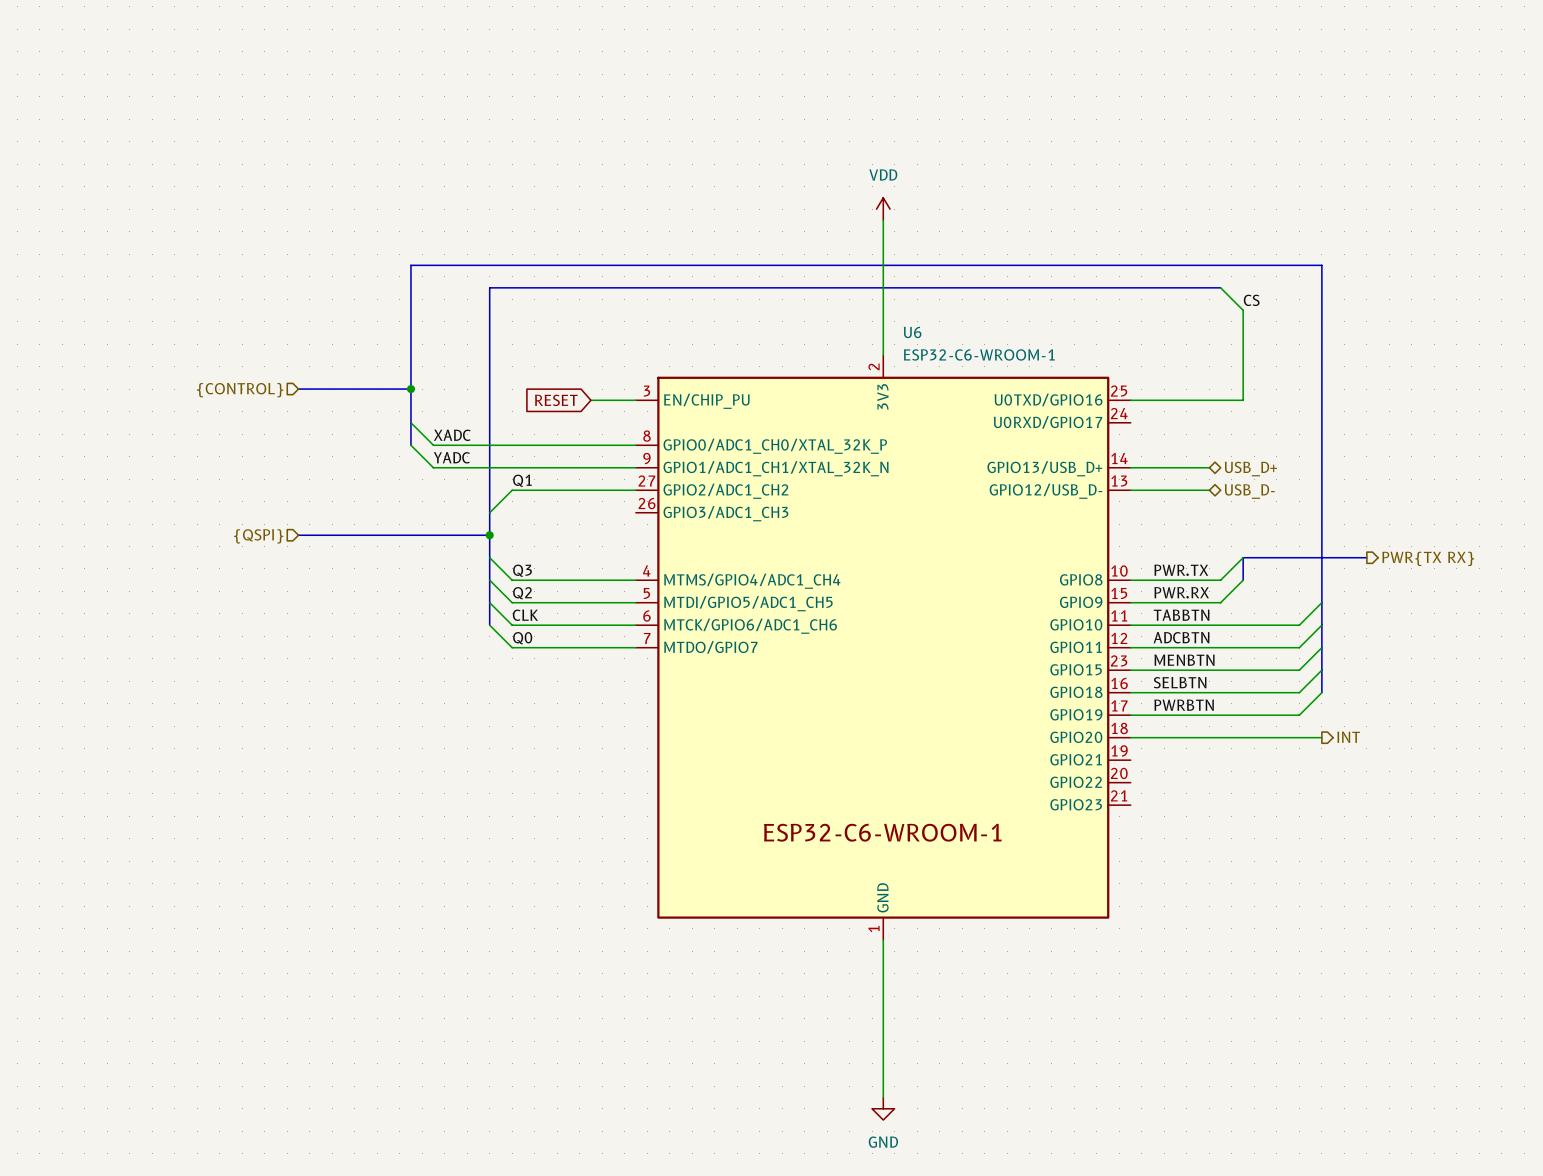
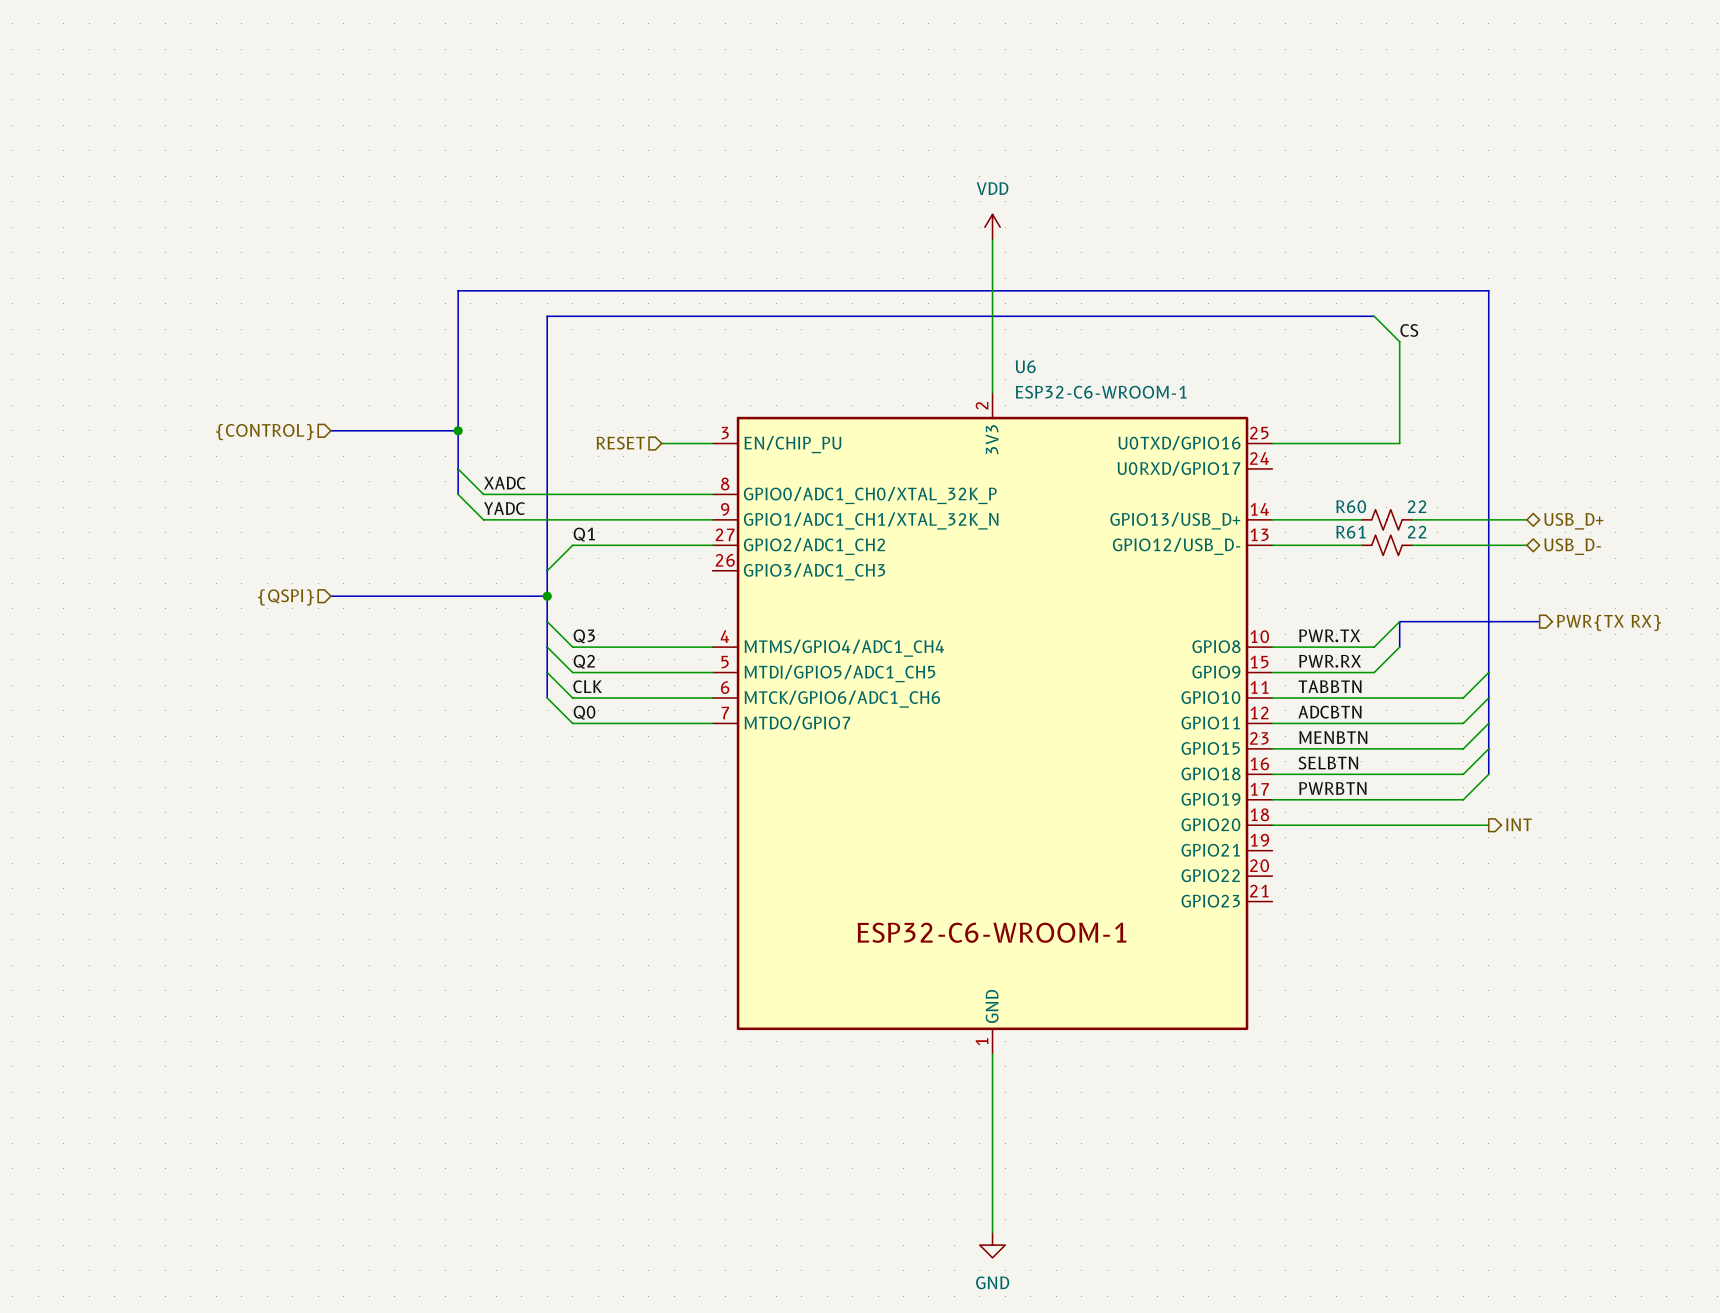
hierarchical label: none -> RESET (620, 443)
global label: RESET (556, 400) -> none
R60: none -> 22 (1386, 519)
wire: none -> (1412, 519) (1526, 519)
hierarchical label position: USB_D+ (1250, 469) -> USB_D+ (1573, 521)
R61: none -> 22 (1386, 545)
wire: none -> (1412, 545) (1526, 545)
hierarchical label position: USB_D- (1249, 491) -> USB_D- (1572, 546)

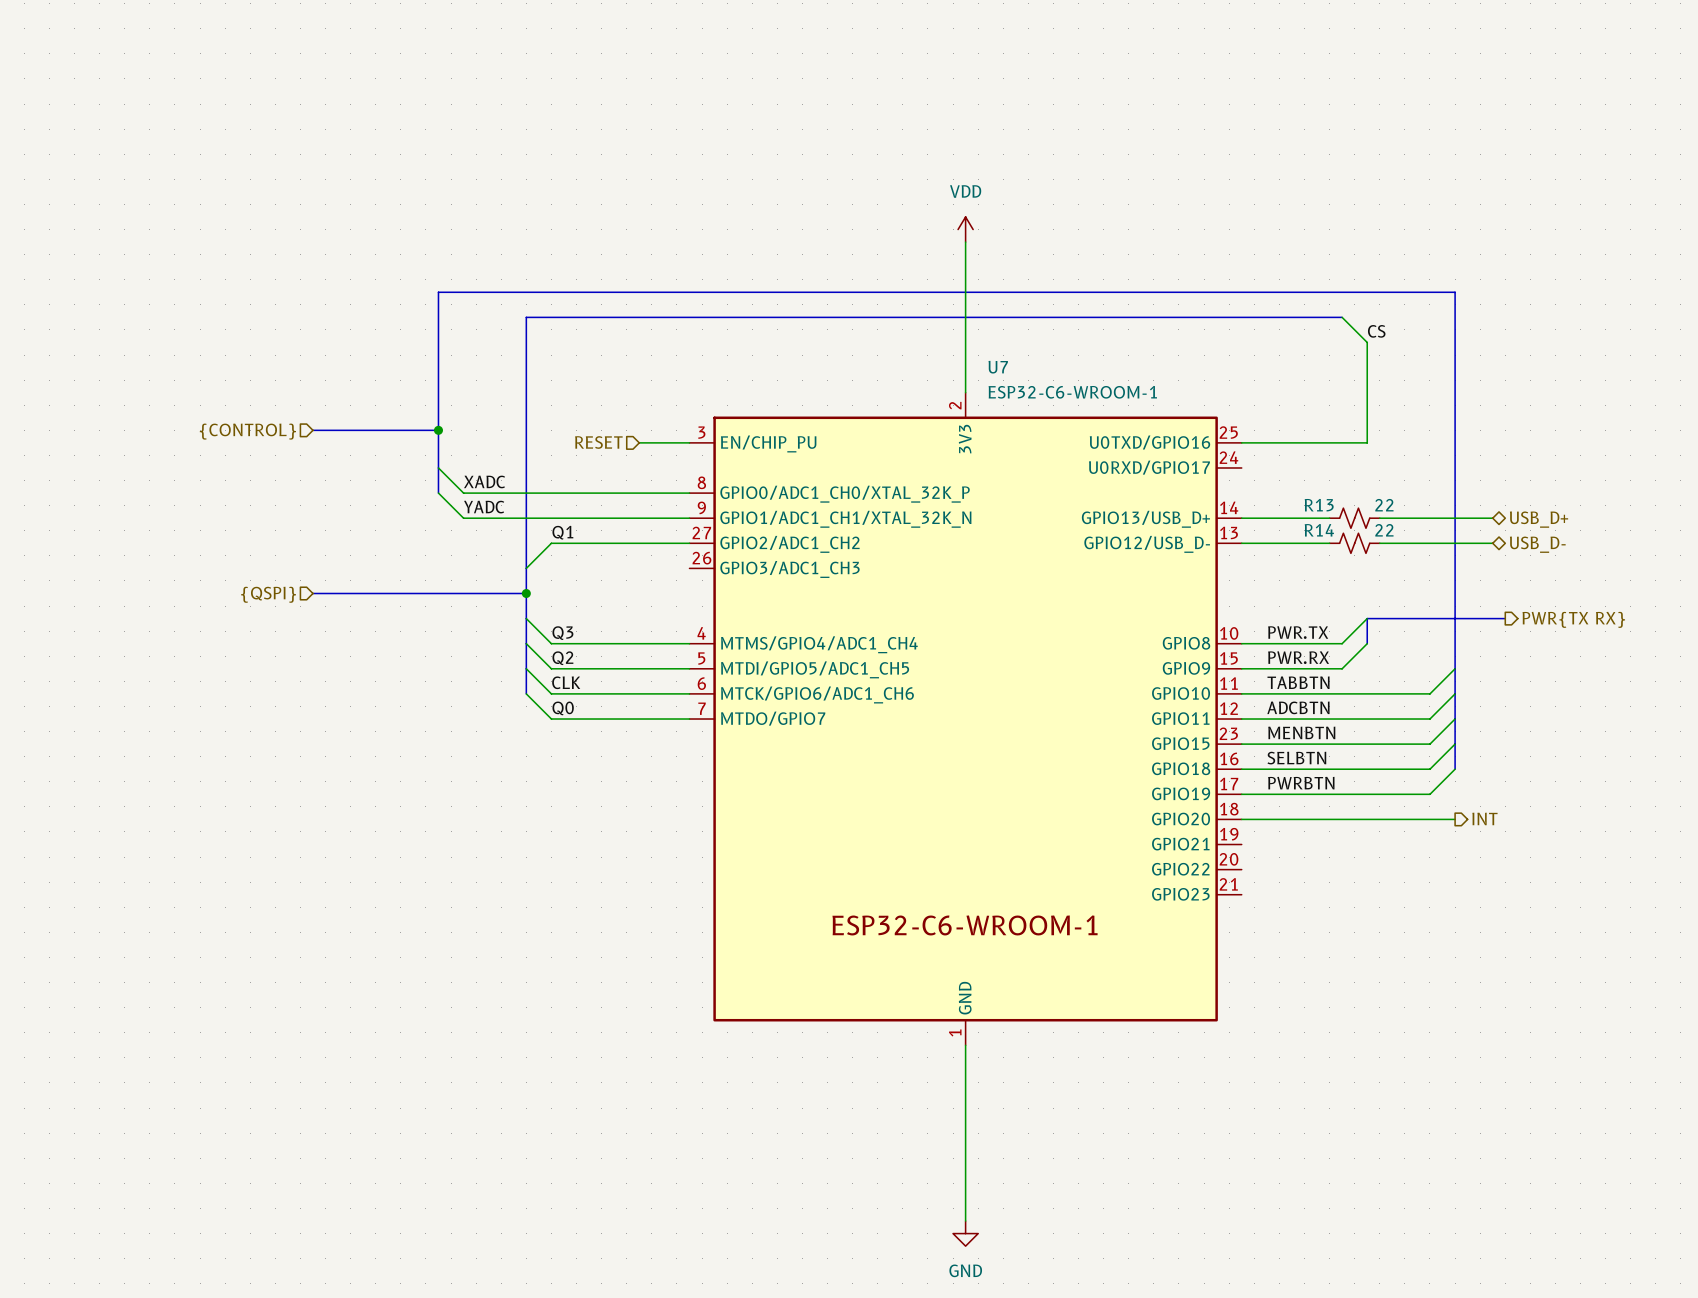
U6 name: U6 (1025, 366) -> U7 (998, 367)
R60 name: R60 (1351, 506) -> R13 (1319, 505)
R61 name: R61 (1350, 532) -> R14 (1319, 530)

